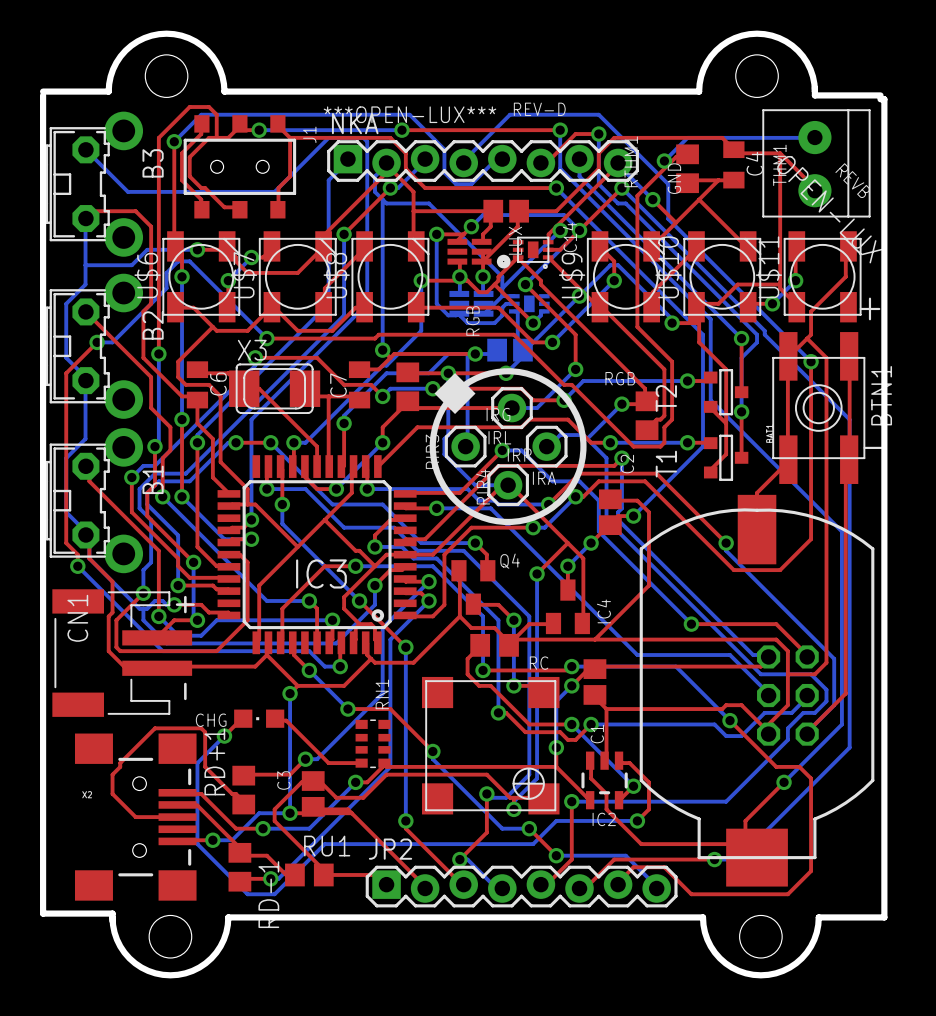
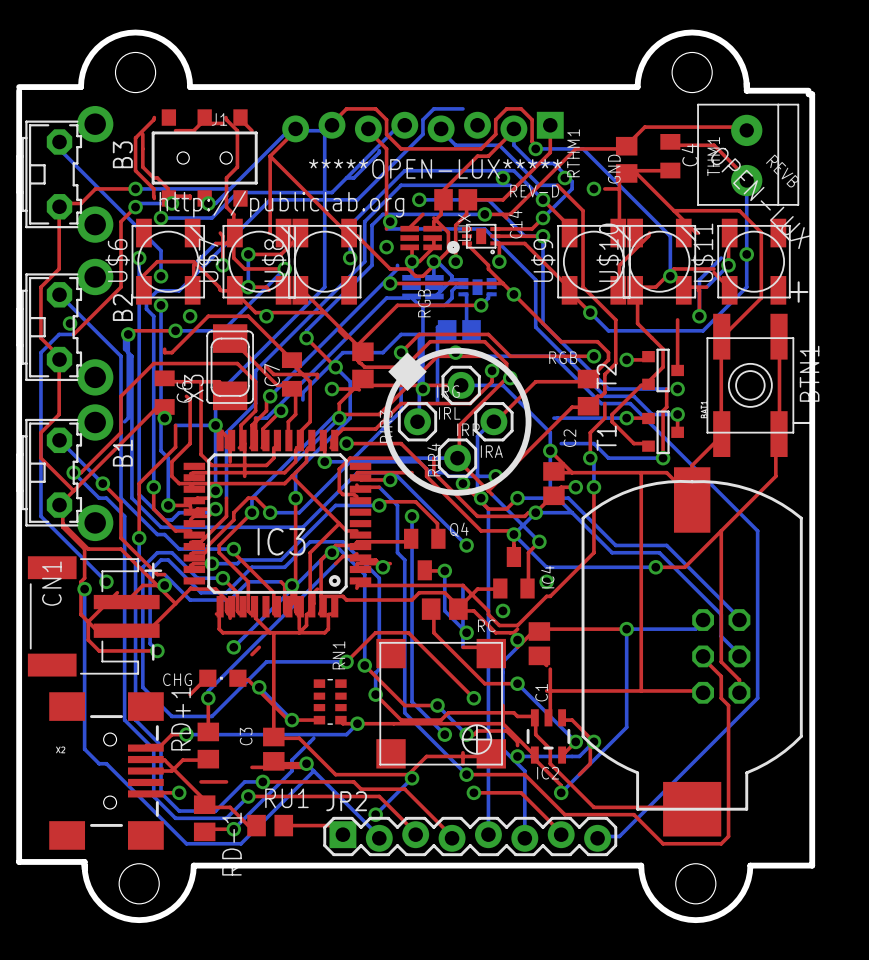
text position: REV-D (539, 109) -> REV-D (534, 191)
text: ***OPEN-LUX*** (409, 114) -> none
bottom track: (510, 114) (463, 162) -> (459, 108) (433, 108) (422, 119) (422, 134) (357, 199) (270, 199) (179, 290) (157, 290) (146, 301) (146, 308) (153, 316) (153, 487)
bottom track: (513, 114) (598, 114) (641, 157) -> (535, 148) (583, 148)
top track: none -> (154, 117) (135, 138) (135, 170) (153, 188) (154, 198)
top track: (201, 123) (201, 134) (182, 153) (182, 180) (189, 188) -> (142, 167) (153, 178) (157, 178)
top track: none -> (225, 117) (237, 130) (237, 167) (226, 178) (226, 207) (233, 214) (233, 258) (244, 268) (284, 268)
bottom track: (259, 130) (401, 130) -> none
via: (259, 130) -> none
top track: (401, 130) (560, 130) -> none
via: (401, 130) -> none
bottom track: (560, 130) (560, 168) (710, 319) (710, 400) (841, 531) (841, 724) (826, 739) -> (757, 661) (757, 698)
via: (560, 130) -> none
top track: none -> (332, 125) (346, 108) (375, 108) (386, 119) (386, 134) (401, 148) (481, 148) (495, 134) (495, 119) (506, 108) (521, 108) (532, 119) (532, 141) (535, 145) (535, 148)
bottom track: none -> (404, 125) (404, 127) (397, 127) (332, 192) (237, 192) (211, 218) (161, 218)
J1 name rotation: 0° (309, 134) -> 90° clockwise (219, 119)
J1 name position: J1 (309, 134) -> J1 (219, 119)
top track: (598, 134) (575, 134) (548, 161) (540, 161) (540, 162) -> none
bottom track: (598, 134) (598, 184) (618, 203) (625, 203) (757, 334) (757, 342) (741, 357) (741, 411) -> none
via: (598, 134) -> none
top track: none -> (295, 128) (270, 156)
top track: none -> (368, 128) (386, 148) (386, 228)
bottom track: none -> (441, 128) (455, 145) (499, 145) (539, 185) (557, 185)
top track: none -> (513, 128) (488, 156) (477, 156) (441, 192) (441, 199)
bottom track: none -> (513, 128) (513, 145) (532, 163) (553, 163) (572, 181) (572, 188) (543, 218)
top track: (209, 137) (189, 157) (189, 176) (201, 188) (205, 188) (224, 207) (239, 207) (239, 209) -> none
top track: (216, 137) (216, 114) (209, 107) (189, 107) (158, 137) (158, 353) -> none
top track: none -> (746, 130) (746, 127) (644, 127) (626, 146)
bottom track: (814, 137) (687, 137) (664, 161) -> none
bottom track: (174, 141) (201, 114) (409, 114) (444, 149) (444, 172) (456, 184) (471, 184) (494, 161) (502, 161) (502, 159) -> none
via: (174, 141) -> none
top track: (733, 149) (722, 137) (614, 137) (598, 153) (598, 168) -> (550, 125) (550, 152) (543, 159)
bottom track: (89, 153) (127, 191) (274, 191) -> (62, 145) (62, 152) (157, 247)
top track: (780, 153) (780, 288) -> none
via: none -> (535, 148)
top track: (675, 157) (637, 195) (637, 326) (672, 361) (672, 419) (664, 427) -> (615, 148) (575, 148) (510, 214) (484, 214)
bottom track: (347, 159) (328, 180) (328, 303) (197, 435) (197, 442) -> none
bottom track: (579, 159) (579, 176) (741, 338) -> none
NKA side: top (483, 161) -> bottom (422, 127)
via: (664, 161) -> none
bottom track: (386, 162) (374, 176) (374, 191) (386, 203) (429, 203) (502, 276) (502, 292) -> (437, 261) (452, 276)
top track: (618, 162) (548, 234) (548, 242) -> (543, 218) (532, 228) (495, 228)
bottom track: (618, 162) (652, 199) -> none
top track: none -> (270, 156) (269, 233)
top track: none -> (270, 156) (350, 236) (357, 236) (390, 268) (408, 268) (415, 276) (422, 276) (448, 250) (448, 232) (433, 218)
top track: (174, 176) (174, 245) (182, 253) (182, 276) -> none
text: none -> *****OPEN-LUX***** (435, 168)
top track: (718, 180) (651, 246) -> none
bottom track: (668, 184) (668, 218) (811, 361) -> (608, 174) (670, 236) (670, 276)
top track: (390, 188) (344, 234) -> none
via: (390, 188) -> none
top track: (556, 188) (425, 188) (405, 168) (405, 153) (390, 137) (290, 137) (290, 176) (278, 188) (277, 209) -> none
bottom track: (556, 188) (703, 334) (703, 446) (633, 516) -> none
top track: (621, 188) (560, 249) -> (543, 236) (506, 236)
bottom track: (621, 188) (764, 330) -> (721, 258) (699, 279) (699, 312)
bottom track: none -> (746, 180) (746, 287) (703, 330) (608, 330) (590, 312)
bottom track: none -> (237, 181) (215, 203) (208, 203)
bottom track: none -> (510, 185) (401, 185) (364, 221) (364, 261) (255, 370) (255, 403) (226, 432) (226, 498)
top track: none -> (557, 185) (583, 210) (583, 287) (615, 319) (615, 363) (604, 374)
bottom track: none -> (135, 188) (230, 188)
via: none -> (135, 188)
bottom track: (382, 199) (382, 350) -> none
top track: (652, 199) (675, 222) -> (550, 450) (572, 472)
top track: none -> (604, 188) (619, 188)
top track: (699, 199) (748, 246) -> none
top track: none -> (190, 198) (190, 196) (175, 196) (175, 199) (171, 203)
top track: (413, 211) (486, 211) -> none
bottom track: none -> (419, 199) (488, 199) (524, 236) (543, 236) (543, 323) (608, 389) (666, 389)
top track: none -> (543, 199) (568, 225) (569, 233)
bottom track: none -> (543, 199) (513, 170) (404, 170) (350, 225) (350, 258)
via: none -> (543, 199)
top track: (89, 215) (93, 211) (135, 211) (151, 226) (151, 234) -> (62, 203) (80, 203) (95, 188) (135, 188)
bottom track: none -> (171, 203) (139, 203) (135, 207)
via: none -> (171, 203)
via: none -> (208, 203)
text: none -> http://publiclab.org (281, 204)
bottom track: (85, 218) (85, 284) (66, 303) (66, 357) (85, 377) (85, 438) (66, 458) -> (73, 334) (59, 334) (40, 352) (40, 432)
top track: none -> (135, 207) (121, 221)
via: none -> (135, 207)
bottom track: (471, 226) (483, 215) (564, 215) (579, 230) (525, 284) -> none
via position: (471, 226) -> (419, 199)
bottom track: none -> (484, 214) (382, 214) (372, 225) (372, 265) (306, 330) (306, 338)
via: none -> (484, 214)
via: none -> (161, 218)
bottom track: (560, 230) (502, 288) -> none
via: (560, 230) -> none
via: (579, 230) -> none
via: none -> (543, 218)
bottom track: (344, 234) (344, 315) (185, 473) (155, 473) (139, 489) (139, 508) (151, 519) -> (59, 294) (121, 356) (121, 490)
via: (344, 234) -> none
top track: (436, 234) (463, 234) -> none
bottom track: (436, 234) (436, 303) (448, 315) -> none
top track: (506, 238) (483, 261) (483, 276) -> (455, 225) (455, 261)
bottom track: none -> (386, 228) (484, 228) (535, 279) (535, 327) (604, 396) (633, 396) (652, 414) (677, 414)
top track: none -> (220, 233) (222, 236) (222, 265)
top track: none -> (300, 233) (281, 254) (248, 254)
top track: (364, 246) (324, 288) (323, 307) -> none
top track: (416, 246) (413, 245) (413, 191) (386, 162) (390, 168) (324, 234) (324, 245) (297, 272) (247, 272) (236, 261) (236, 257) (227, 246) (224, 249) (197, 249) -> none
top track: (599, 246) (614, 261) (614, 280) -> none
top track: none -> (618, 233) (619, 181) (626, 173) (633, 170) (698, 233)
top track: (696, 246) (652, 292) (651, 307) -> none
top track: none -> (649, 233) (619, 265) (618, 290)
top track: (848, 246) (845, 249) (845, 276) (811, 311) (811, 334) -> (673, 210) (739, 210) (761, 232) (761, 298) (743, 316)
bottom track: (197, 249) (147, 249) (131, 265) (85, 265) -> none
via: (197, 249) -> none
via: none -> (543, 236)
via: (251, 257) -> none
top track: (517, 257) (498, 276) (498, 280) (486, 292) (479, 292) (459, 272) -> none
top track: (548, 257) (656, 361) -> (495, 243) (524, 243) (568, 287) (568, 290) (590, 312)
top track: none -> (495, 243) (499, 243) (499, 261)
bottom track: (189, 261) (178, 261) (166, 272) (166, 288) (112, 342) (97, 342) -> none
via: none -> (386, 247)
top track: none -> (433, 247) (419, 261)
bottom track: (193, 265) (266, 338) -> (161, 250) (161, 276)
bottom track: none -> (248, 254) (248, 287)
via: none -> (248, 254)
via: none -> (746, 254)
bottom track: none -> (139, 258) (139, 494) (164, 519) (171, 519) (179, 512) (211, 512)
via: none -> (139, 258)
via: none -> (350, 258)
bottom track: (182, 276) (182, 419) -> none
via: (182, 276) -> none
U$8 position: (390, 276) -> (324, 261)
via: none -> (455, 261)
via: none -> (499, 261)
U$9 position: (625, 276) -> (593, 261)
via: (228, 280) -> none
via: none -> (222, 265)
top track: (421, 280) (467, 280) -> none
bottom track: (421, 280) (421, 330) (386, 365) (382, 365) -> (401, 298) (386, 298) (339, 345)
via: (421, 280) -> none
bottom track: none -> (397, 265) (397, 268) (270, 396)
bottom track: (614, 280) (552, 342) -> none
via: (614, 280) -> none
bottom track: none -> (284, 268) (222, 330) (175, 330)
via: none -> (284, 268)
top track: (494, 284) (533, 323) -> none
top track: (525, 284) (575, 334) (575, 369) -> none
via: (525, 284) -> none
via: none -> (161, 276)
via: none -> (670, 276)
via: (579, 296) -> none
top track: none -> (390, 283) (502, 283)
via: none -> (390, 283)
top track: none -> (248, 287) (266, 287) (269, 290)
via: none -> (248, 287)
via: (772, 303) -> none
top track: (175, 307) (193, 307) (216, 330) (247, 330) (270, 307) (274, 307) (297, 330) -> (140, 290) (142, 287) (142, 276) (157, 261) (193, 261) (220, 290) (233, 290) (255, 312) (259, 312)
top track: none -> (300, 290) (357, 345)
top track: (364, 307) (355, 307) (332, 330) -> (324, 312) (291, 312)
top track: (416, 307) (498, 307) (533, 342) (552, 342) -> none
top track: none -> (698, 290) (699, 316)
top track: (85, 311) (151, 377) (151, 408) (170, 427) (170, 450) -> (164, 407) (157, 407) (139, 425)
top track: (143, 311) (143, 357) (182, 396) (197, 396) (197, 400) -> (113, 294) (73, 334)
via: none -> (513, 294)
bottom track: none -> (161, 305) (161, 450) (168, 458) (168, 505)
via: none -> (161, 305)
bottom track: none -> (422, 305) (422, 389)
top track: none -> (473, 305) (397, 305) (357, 345)
top track: (672, 323) (699, 323) -> none
bottom track: (672, 323) (672, 319) (618, 265) (610, 265) (525, 350) (521, 350) (521, 357) (506, 373) -> none
via position: (672, 323) -> (590, 312)
top track: (212, 326) (178, 361) (178, 377) (185, 384) -> (73, 472) (80, 472) (121, 432) (121, 396) (153, 363)
via: none -> (190, 316)
via: none -> (266, 316)
bottom track: (764, 334) (849, 419) (849, 747) (737, 859) (714, 859) -> none
via: none -> (699, 316)
top track: (266, 338) (374, 338) (378, 334) (513, 334) (564, 384) (571, 384) (633, 446) (660, 446) -> (590, 458) (590, 432) (601, 421)
via: (266, 338) -> none
via: (741, 338) -> none
top track: (807, 338) (826, 357) (826, 662) (814, 674) (787, 674) -> none
top track: (97, 342) (66, 373) (66, 458) -> (59, 206) (59, 268) (40, 287) (40, 338) (59, 356) (59, 414) (40, 432)
via: (552, 342) -> none
bottom track: none -> (439, 327) (437, 327) (437, 403)
top track: none -> (124, 330) (175, 330)
bottom track: none -> (124, 330) (124, 349) (131, 356) (131, 498) (161, 527) (302, 527) (357, 472) (393, 472) (466, 545)
via: none -> (175, 330)
via: (382, 350) -> none
top track: (467, 353) (394, 353) (378, 369) (359, 369) -> (419, 334) (401, 352)
top track: none -> (426, 334) (488, 334) (510, 356) (593, 356)
via: (475, 353) -> none
top track: (255, 357) (317, 357) (344, 384) (371, 384) (382, 396) -> none
bottom track: (255, 357) (255, 365) (155, 465) (143, 465) (131, 477) -> none
via: (255, 357) -> none
top track: none -> (306, 338) (335, 367)
via: none -> (306, 338)
top track: (618, 361) (645, 388) (645, 400) (647, 401) -> (561, 341) (597, 341)
top track: (811, 361) (811, 539) -> (775, 476) (743, 509)
via: (811, 361) -> none
top track: none -> (357, 345) (357, 359) (364, 367) (386, 367)
bottom track: (575, 369) (537, 408) -> none
via: (575, 369) -> none
top track: (664, 369) (664, 396) -> (604, 349) (608, 352) (608, 359) (588, 379)
top track: (407, 372) (506, 373) -> none
top track: (205, 373) (228, 373) (243, 388) (259, 388) (317, 446) (317, 466) -> (171, 352) (208, 316) (248, 316) (291, 359) (291, 363) (310, 381) (310, 421) (299, 432) (299, 447) (295, 450) (295, 461) (284, 472) (190, 473)
top track: none -> (481, 356) (437, 356) (379, 414) (335, 414)
bottom track: none -> (481, 356) (553, 356) (601, 403) (630, 403) (757, 530) (757, 650)
via: none -> (593, 356)
bottom track: (687, 381) (583, 381) (564, 400) -> none
C6 position: (197, 384) -> (164, 392)
top track: (209, 384) (220, 396) (220, 462) (247, 489) (247, 504) -> (175, 363) (237, 363) (255, 381) (255, 410) (241, 425) (241, 447) (239, 447)
C7 position: (359, 384) -> (291, 374)
X3 rotation: 0° (274, 388) -> 90° counterclockwise (230, 367)
bottom track: none -> (335, 367) (350, 381) (350, 418) (295, 472) (295, 498)
via: none -> (335, 367)
bottom track: (432, 388) (390, 388) (382, 396) -> none
via: (432, 388) -> none
top track: (452, 388) (521, 388) (533, 400) (564, 400) -> (404, 367) (430, 341) (484, 341) (506, 363) (506, 378) (459, 425) (459, 458)
top track: (726, 388) (726, 435) -> (666, 389) (666, 407) (663, 410)
top track: none -> (663, 367) (648, 381) (648, 384)
via: none -> (492, 370)
top track: (328, 396) (328, 446) -> (230, 338) (277, 385) (291, 385) (291, 389) (295, 392) (295, 414) (288, 421)
via: (382, 396) -> none
top track: (197, 404) (197, 423) (212, 438) (212, 477) (228, 493) -> (164, 381) (219, 381) (230, 392) (230, 395)
top track: none -> (201, 381) (201, 454) (211, 465) (266, 465) (273, 458) (273, 447)
top track: none -> (564, 381) (535, 381) (493, 421)
bottom track: (621, 404) (587, 438) -> none
via: (621, 404) -> none
top track: (710, 408) (726, 423) -> (648, 385) (641, 385) (612, 414) (612, 421) (633, 443) (648, 443)
top track: none -> (332, 389) (359, 389)
via: none -> (332, 389)
via: none -> (422, 389)
top track: (741, 411) (741, 438) -> none
top track: (182, 419) (182, 496) -> none
via: (182, 419) -> none
top track: none -> (186, 396) (190, 399) (190, 443) (171, 461) (171, 476) (179, 483) (284, 483) (306, 461) (308, 447)
top track: none -> (270, 396) (266, 399) (266, 410) (251, 425) (250, 447)
via: none -> (270, 396)
top track: (529, 419) (567, 419) (591, 442) (610, 442) -> (477, 396) (492, 381) (492, 370)
top track: (344, 423) (344, 465) (341, 466) -> none
via: (344, 423) -> none
top track: (448, 427) (417, 427) (377, 466) -> (401, 403) (375, 429) (342, 429) (332, 439) (331, 447)
top track: none -> (588, 406) (572, 407) (488, 490)
top track: none -> (281, 410) (262, 429) (262, 447)
via: none -> (281, 410)
bottom track: (583, 435) (560, 435) (546, 446) -> (528, 410) (502, 385) (484, 385)
bottom track: none -> (335, 414) (251, 498) (251, 512)
bottom track: (444, 438) (444, 454) (475, 485) -> (397, 458) (426, 458)
bottom track: none -> (397, 414) (299, 512) (270, 512)
via: none -> (677, 414)
top track: (197, 442) (197, 546) (216, 566) (228, 566) -> none
top track: (236, 442) (270, 442) -> none
bottom track: (236, 442) (228, 442) (189, 481) (158, 481) (147, 492) (147, 504) (178, 535) (178, 585) -> none
via: (236, 442) -> none
bottom track: (270, 442) (332, 504) (382, 504) (421, 543) (475, 543) -> none
via: (270, 442) -> none
via: (293, 442) -> none
via: (610, 442) -> none
top track: (155, 446) (155, 485) (147, 492) (147, 516) (193, 562) -> none
via: (155, 446) -> none
bottom track: none -> (493, 421) (477, 436) (477, 498) (488, 509) (488, 834)
top track: none -> (175, 425) (175, 447) (139, 483) (139, 538)
bottom track: none -> (175, 425) (215, 425)
top track: none -> (215, 425) (226, 436) (227, 447)
via: none -> (215, 425)
top track: (502, 450) (459, 492) (405, 493) -> none
bottom track: (502, 450) (521, 450) (552, 481) (579, 481) (598, 500) (598, 531) (691, 624) -> none
via: (502, 450) -> none
top track: (726, 454) (710, 469) -> (663, 429) (663, 458)
top track: (162, 458) (162, 496) -> (131, 432) (59, 505)
top track: (621, 458) (614, 465) (498, 465) (425, 539) (405, 539) (405, 542) -> none
bottom track: (621, 458) (621, 508) (618, 512) (618, 519) (625, 527) -> (517, 498) (568, 498)
via: (621, 458) -> none
top track: (85, 466) (89, 469) (89, 481) (158, 550) (158, 616) -> none
bottom track: none -> (59, 440) (102, 483)
top track: (304, 466) (305, 477) (317, 489) (336, 489) -> none
top track: (353, 466) (351, 469) (351, 492) (259, 585) (259, 639) (256, 642) -> none
top track: none -> (346, 443) (401, 443) (426, 469) (426, 476) (481, 530) (510, 530)
via: none -> (346, 443)
bottom track: none -> (561, 443) (593, 443) (608, 458) (663, 458)
top track: (131, 477) (131, 512) -> none
via: (131, 477) -> none
via: none -> (550, 450)
top track: (66, 485) (66, 543) (77, 554) (77, 566) -> (40, 458) (73, 490)
top track: none -> (397, 458) (350, 458) (339, 469) (339, 490) (342, 494) (353, 494) (356, 496)
top track: none -> (433, 458) (433, 472) (477, 516) (524, 516) (528, 512)
top track: (506, 485) (502, 485) (432, 554) (386, 554) (344, 597) (344, 608) (359, 624) (371, 624) (374, 627) (374, 639) (377, 642) -> (455, 458) (492, 494)
top track: (510, 485) (583, 558) (583, 585) -> (539, 541) (528, 552)
bottom track: none -> (590, 458) (593, 461) (593, 487)
via: none -> (590, 458)
via: none -> (663, 458)
bottom track: (266, 489) (305, 489) (344, 527) (394, 527) (417, 550) (463, 550) (529, 616) (529, 774) (506, 797) (490, 797) (486, 793) -> none
via: (266, 489) -> none
via: (336, 489) -> none
bottom track: (162, 496) (266, 600) (290, 600) -> (157, 650) (150, 643) (150, 570) (161, 560) (168, 560) (201, 592) (226, 592) (251, 567)
via: (162, 496) -> none
bottom track: (182, 496) (224, 539) (251, 539) -> none
via: (182, 496) -> none
top track: (575, 496) (583, 496) (598, 481) (645, 481) (733, 570) (780, 570) -> (655, 567) (684, 567) (714, 538)
bottom track: (575, 496) (544, 527) (533, 527) -> none
via: (575, 496) -> none
bottom track: none -> (73, 472) (99, 498) (106, 498) (124, 516) (124, 720) (153, 749) (153, 796) (175, 818) (226, 818) (248, 796)
via: none -> (73, 472)
top track: none -> (412, 472) (356, 473)
top track: (637, 500) (648, 512) (648, 585) (602, 631) -> (593, 487) (593, 552) (550, 596) (546, 596)
top track: none -> (579, 472) (666, 472) (692, 498)
top track: none -> (641, 472) (641, 690)
bottom track: (282, 504) (282, 523) (359, 600) -> none
via: (282, 504) -> none
top track: none -> (291, 476) (346, 530) (356, 530)
top track: (548, 504) (579, 473) (656, 473) (726, 543) -> none
top track: (845, 504) (845, 693) (807, 732) -> none
top track: (228, 506) (255, 504) (297, 546) -> none
bottom track: (436, 508) (490, 508) (637, 655) (730, 655) (768, 695) -> none
bottom track: (66, 512) (85, 531) (85, 534) (89, 535) (89, 558) (139, 608) (147, 608) (155, 600) (162, 600) (166, 604) (174, 604) -> (40, 483) (40, 516) (106, 581)
via: none -> (102, 483)
top track: none -> (462, 483) (488, 509) (506, 509) (517, 498)
via: none -> (462, 483)
top track: none -> (356, 485) (357, 487) (379, 487)
top track: none -> (153, 487) (153, 509) (175, 530) (190, 530)
via: none -> (153, 487)
bottom track: none -> (379, 487) (397, 505) (397, 552) (404, 560) (404, 712) (466, 774)
via: none -> (593, 487)
top track: (405, 518) (390, 519) (374, 535) (374, 546) -> none
top track: (324, 519) (355, 550) (359, 550) (374, 566) -> none
bottom track: none -> (492, 494) (539, 541)
bottom track: (151, 527) (151, 562) (143, 570) (143, 593) -> (121, 498) (157, 534) (164, 534) (179, 549) (233, 549)
top track: none -> (226, 498) (226, 516) (201, 541) (190, 542)
top track: none -> (295, 498) (296, 613)
via: none -> (295, 498)
top track: (533, 527) (471, 527) (444, 554) (444, 604) (432, 616) (405, 615) -> none
via: none -> (517, 498)
top track: (151, 531) (178, 558) (178, 566) (189, 577) (228, 578) -> (121, 501) (121, 538) (157, 574) (164, 574)
top track: none -> (168, 505) (190, 505) (190, 507)
via: none -> (168, 505)
top track: none -> (379, 505) (382, 501) (415, 501) (426, 512)
bottom track: none -> (379, 505) (335, 505) (281, 560) (241, 560) (237, 563) (211, 563)
via: none -> (379, 505)
top track: none -> (211, 512) (208, 516) (193, 516) (190, 519)
top track: none -> (251, 512) (219, 545) (219, 552) (248, 581) (248, 610) (250, 613)
via: none -> (251, 512)
top track: none -> (270, 512) (255, 498) (248, 498) (233, 512) (233, 519) (208, 545) (208, 549) (204, 552) (190, 553)
via: none -> (270, 512)
via position: (475, 543) -> (412, 516)
top track: (567, 543) (537, 573) -> none
bottom track: none -> (528, 512) (572, 512)
bottom track: (726, 543) (726, 550) (834, 658) (834, 705) (807, 734) -> none
via: (726, 543) -> none
bottom track: (374, 546) (401, 546) (413, 558) (436, 558) (498, 620) (498, 712) -> none
via: (374, 546) -> none
bottom track: none -> (412, 516) (412, 701) (444, 734)
top track: none -> (62, 523) (88, 549) (121, 549) (175, 603)
top track: (228, 554) (239, 554) (247, 562) (247, 620) (216, 651) (120, 651) (116, 647) (116, 620) (143, 593) -> none
top track: none -> (339, 523) (310, 552) (310, 610) (306, 614) (306, 625) (299, 632)
bottom track: (193, 562) (193, 616) (197, 620) -> none
via: (193, 562) -> none
bottom track: none -> (510, 530) (546, 567) (655, 567)
bottom track: (77, 566) (162, 651) (309, 651) (324, 666) (340, 666) -> none
via: (77, 566) -> none
top track: (355, 566) (324, 566) (282, 608) (282, 639) (280, 642) -> none
bottom track: (355, 566) (432, 566) (483, 616) (483, 670) -> none
via: (355, 566) -> none
top track: (405, 566) (401, 570) (390, 570) (374, 585) -> none
via: none -> (139, 538)
top track: (458, 570) (459, 616) -> (411, 538) (408, 541) (357, 541) (353, 545) (335, 545) (321, 560) (319, 613)
bottom track: (537, 573) (537, 778) (513, 801) (513, 809) -> none
via position: (537, 573) -> (466, 545)
via: none -> (539, 541)
bottom track: (675, 577) (753, 655) (768, 655) (768, 656) -> (615, 545) (666, 545) (739, 620)
top track: (405, 578) (405, 581) (429, 581) -> none
top track: none -> (233, 549) (233, 552) (273, 592) (273, 613)
via: none -> (233, 549)
bottom track: (429, 581) (382, 627) (382, 693) (317, 759) (305, 759) -> none
via: (429, 581) -> none
top track: (178, 585) (212, 585) (216, 589) (228, 589) (228, 591) -> none
via: (178, 585) -> none
bottom track: (374, 585) (374, 604) (336, 643) (166, 643) (143, 620) (143, 608) -> none
bottom track: (672, 585) (760, 674) (811, 674) (826, 689) -> (612, 552) (659, 552) (721, 614) (721, 636) (739, 656)
top track: none -> (356, 553) (353, 556) (342, 556) (335, 563)
via: (143, 593) -> none
top track: none -> (211, 563) (190, 565)
via: none -> (211, 563)
bottom track: none -> (335, 563) (208, 690) (208, 698)
top track: none -> (390, 563) (357, 563) (356, 565)
top track: (309, 600) (317, 608) (317, 642) -> none
bottom track: none -> (270, 567) (284, 567) (310, 541) (342, 541) (379, 578) (379, 669) (375, 672) (375, 694)
via: (309, 600) -> none
top track: (359, 600) (405, 647) -> none
via: (359, 600) -> none
bottom track: (429, 600) (390, 639) (390, 766) (278, 878) (270, 878) -> none
via: none -> (655, 567)
top track: (174, 604) (201, 604) (209, 612) (228, 612) (228, 615) -> none
via: (174, 604) -> none
top track: (494, 604) (498, 604) (513, 620) -> none
bottom track: none -> (444, 570) (444, 610) (466, 632)
via: none -> (444, 570)
bottom track: none -> (164, 574) (190, 600) (230, 600) (248, 581) (281, 581)
top track: none -> (222, 578) (237, 592) (237, 610) (239, 613)
bottom track: none -> (222, 578) (197, 578) (171, 552) (157, 552) (142, 567) (142, 687) (171, 716) (211, 716) (266, 661) (346, 661)
via: none -> (222, 578)
via: none -> (106, 581)
bottom track: (158, 616) (178, 635) (201, 635) (216, 620) (332, 620) -> none
via: (158, 616) -> none
top track: none -> (281, 581) (284, 585) (285, 613)
top track: (459, 616) (471, 627) -> (321, 596) (342, 596) (346, 600) (412, 600) (419, 592) (422, 592)
top track: (459, 616) (413, 662) (374, 662) (367, 655) (365, 642) -> none
via: none -> (546, 581)
via: (513, 620) -> none
top track: none -> (356, 588) (357, 585) (462, 585) (488, 610) (488, 614) (499, 625) (517, 625) (539, 603)
via: none -> (84, 589)
top track: (691, 624) (776, 624) (807, 656) -> none
via: (691, 624) -> none
top track: none -> (117, 592) (88, 621) (88, 640) (99, 650) (157, 650)
top track: (480, 645) (467, 658) (467, 674) (479, 685) (490, 685) (529, 724) (537, 724) -> (431, 609) (433, 610) (433, 632) (484, 683)
top track: (509, 645) (513, 639) (776, 639) (787, 651) -> (721, 530) (721, 614)
bottom track: (405, 647) (405, 820) -> none
via: (405, 647) -> none
via: none -> (502, 610)
top track: none -> (216, 613) (219, 614) (219, 629) (222, 632) (324, 632) (328, 629) (328, 614) (331, 613)
top track: (768, 656) (760, 666) (687, 666) -> none
bottom track: none -> (703, 620) (695, 629) (626, 629) (626, 727) (561, 792)
top track: (371, 658) (344, 685) (297, 685) (266, 655) (255, 666) (182, 666) -> (227, 613) (226, 600) (215, 589) (190, 588) (150, 629)
via: (340, 666) -> none
bottom track: (571, 666) (675, 666) (730, 720) -> none
via: (571, 666) -> none
via: none -> (626, 629)
bottom track: (309, 670) (347, 709) -> none
via: (309, 670) -> none
top track: none -> (273, 632) (273, 737)
top track: (483, 670) (548, 670) -> (458, 609) (459, 610) (473, 610) (495, 632)
via: (483, 670) -> none
via: none -> (517, 640)
bottom track: none -> (233, 647) (332, 549) (339, 549) (364, 574) (364, 665)
via: none -> (233, 647)
via position: (513, 685) -> (466, 632)
via: (571, 685) -> none
via: none -> (157, 650)
bottom track: (290, 693) (290, 813) (259, 813) (232, 840) (212, 840) -> none
via: (290, 693) -> none
bottom track: (807, 695) (791, 712) (764, 712) (741, 736) (726, 736) (714, 724) (591, 724) -> none
top track: none -> (346, 661) (375, 632) (408, 632) (473, 698)
via: none -> (346, 661)
top track: (787, 701) (787, 705) (764, 728) (768, 734) -> (721, 661) (739, 680) (739, 690)
bottom track: (826, 701) (814, 712) (803, 712) (787, 728) (787, 739) (726, 801) (637, 801) -> (593, 741) (579, 756)
top track: none -> (364, 665) (404, 705) (437, 705)
via: none -> (364, 665)
top track: (602, 705) (606, 709) (722, 709) (726, 705) (741, 705) (768, 732) -> (546, 690) (703, 690)
top track: (347, 709) (390, 709) (432, 751) -> none
via: (347, 709) -> none
top track: (498, 712) (506, 712) (525, 732) (560, 732) (567, 739) (575, 739) (591, 724) -> none
via: (498, 712) -> none
top track: (730, 720) (776, 766) (799, 766) (811, 778) (811, 871) (795, 886) -> (703, 656) (721, 676) (721, 698) (728, 705) (728, 836)
via: (730, 720) -> none
via: (591, 724) -> none
bottom track: none -> (259, 687) (291, 720)
via: none -> (259, 687)
bottom track: (224, 736) (197, 763) (197, 844) -> (139, 538) (139, 560) (135, 563) (135, 720) (161, 745) (161, 792) (164, 796)
via position: (224, 736) -> (208, 698)
top track: none -> (375, 694) (401, 720) (441, 720) (448, 712) (513, 712) (517, 716) (534, 717)
via: none -> (375, 694)
via: none -> (473, 698)
bottom track: none -> (437, 705) (466, 734)
via: none -> (437, 705)
bottom track: none -> (502, 705) (502, 749) (524, 771) (524, 838)
via: (556, 747) -> none
bottom track: (432, 751) (432, 759) (502, 828) (529, 828) -> none
via: (432, 751) -> none
top track: (305, 759) (290, 774) (243, 774) -> (208, 698) (208, 730)
via: (305, 759) -> none
via: none -> (291, 720)
top track: (384, 763) (367, 782) (355, 782) -> none
bottom track: none -> (357, 723) (346, 734) (186, 734)
via: none -> (357, 723)
via: none -> (186, 734)
via: none -> (444, 734)
top track: none -> (466, 734) (473, 734) (477, 730) (506, 730) (517, 741) (517, 745)
via: none -> (466, 734)
top track: (313, 782) (301, 782) (274, 809) (274, 820) (328, 874) -> none
top track: (320, 782) (336, 797) (363, 797) (386, 774) (486, 774) (510, 797) (543, 798) -> (281, 738) (299, 738) (335, 774) (408, 774)
via: (355, 782) -> none
top track: (784, 782) (745, 820) (745, 844) -> none
via: (784, 782) -> none
via: none -> (593, 741)
top track: (177, 792) (201, 793) (236, 828) -> (145, 748) (146, 745) (161, 745) (171, 734) (186, 734)
top track: (486, 793) (486, 832) (459, 859) -> none
via: (486, 793) -> none
top track: none -> (491, 753) (488, 756) (426, 756) (408, 774)
top track: none -> (534, 755) (532, 756) (561, 785) (561, 792)
top track: (571, 801) (571, 859) (548, 882) (540, 882) (540, 884) -> none
top track: (243, 804) (243, 801) (236, 793) (232, 793) (205, 766) (205, 732) (201, 728) (155, 728) (120, 763) (120, 766) (112, 774) (112, 793) (135, 817) (177, 817) -> (208, 759) (182, 760) (171, 771) (145, 771)
bottom track: (332, 805) (309, 828) (301, 828) -> (291, 760) (291, 771) (233, 829)
top track: (347, 809) (425, 888) -> none
bottom track: none -> (306, 763) (379, 838)
via: none -> (306, 763)
via: (513, 809) -> none
via: (290, 813) -> none
top track: (405, 820) (405, 828) (463, 886) (463, 884) -> (248, 796) (379, 796) (415, 834)
via: (405, 820) -> none
via: none -> (466, 774)
bottom track: (637, 820) (556, 820) (533, 844) (324, 844) (274, 894) -> (313, 771) (241, 843) (237, 843)
via: (637, 820) -> none
bottom track: none -> (412, 778) (375, 814)
via: none -> (412, 778)
bottom track: (263, 828) (282, 828) -> (179, 811) (215, 811) (244, 781)
via: (263, 828) -> none
top track: none -> (262, 781) (353, 781) (361, 789) (404, 789) (452, 838)
via: none -> (262, 781)
top track: (529, 828) (556, 855) -> none
via: (529, 828) -> none
top track: none -> (473, 792) (521, 792) (561, 832)
via: none -> (473, 792)
via: none -> (561, 792)
via: none -> (248, 796)
top track: (641, 844) (745, 844) -> (583, 796) (593, 807) (692, 807)
bottom track: (556, 855) (625, 855) (656, 886) -> (717, 738) (619, 836) (597, 836)
via: (556, 855) -> none
bottom track: (212, 859) (247, 894) -> (84, 589) (84, 749) (99, 763) (106, 763) (186, 843) (211, 843)
bottom track: (459, 859) (467, 859) (494, 886) (502, 886) (502, 888) -> none
via: (459, 859) -> none
top track: (714, 859) (614, 859) (587, 886) (579, 886) (579, 888) -> none
via: (714, 859) -> none
via: none -> (375, 814)
top track: (618, 882) (633, 867) (664, 867) (691, 894) (726, 894) -> (466, 774) (524, 774) (564, 814) (633, 814) (663, 843)

